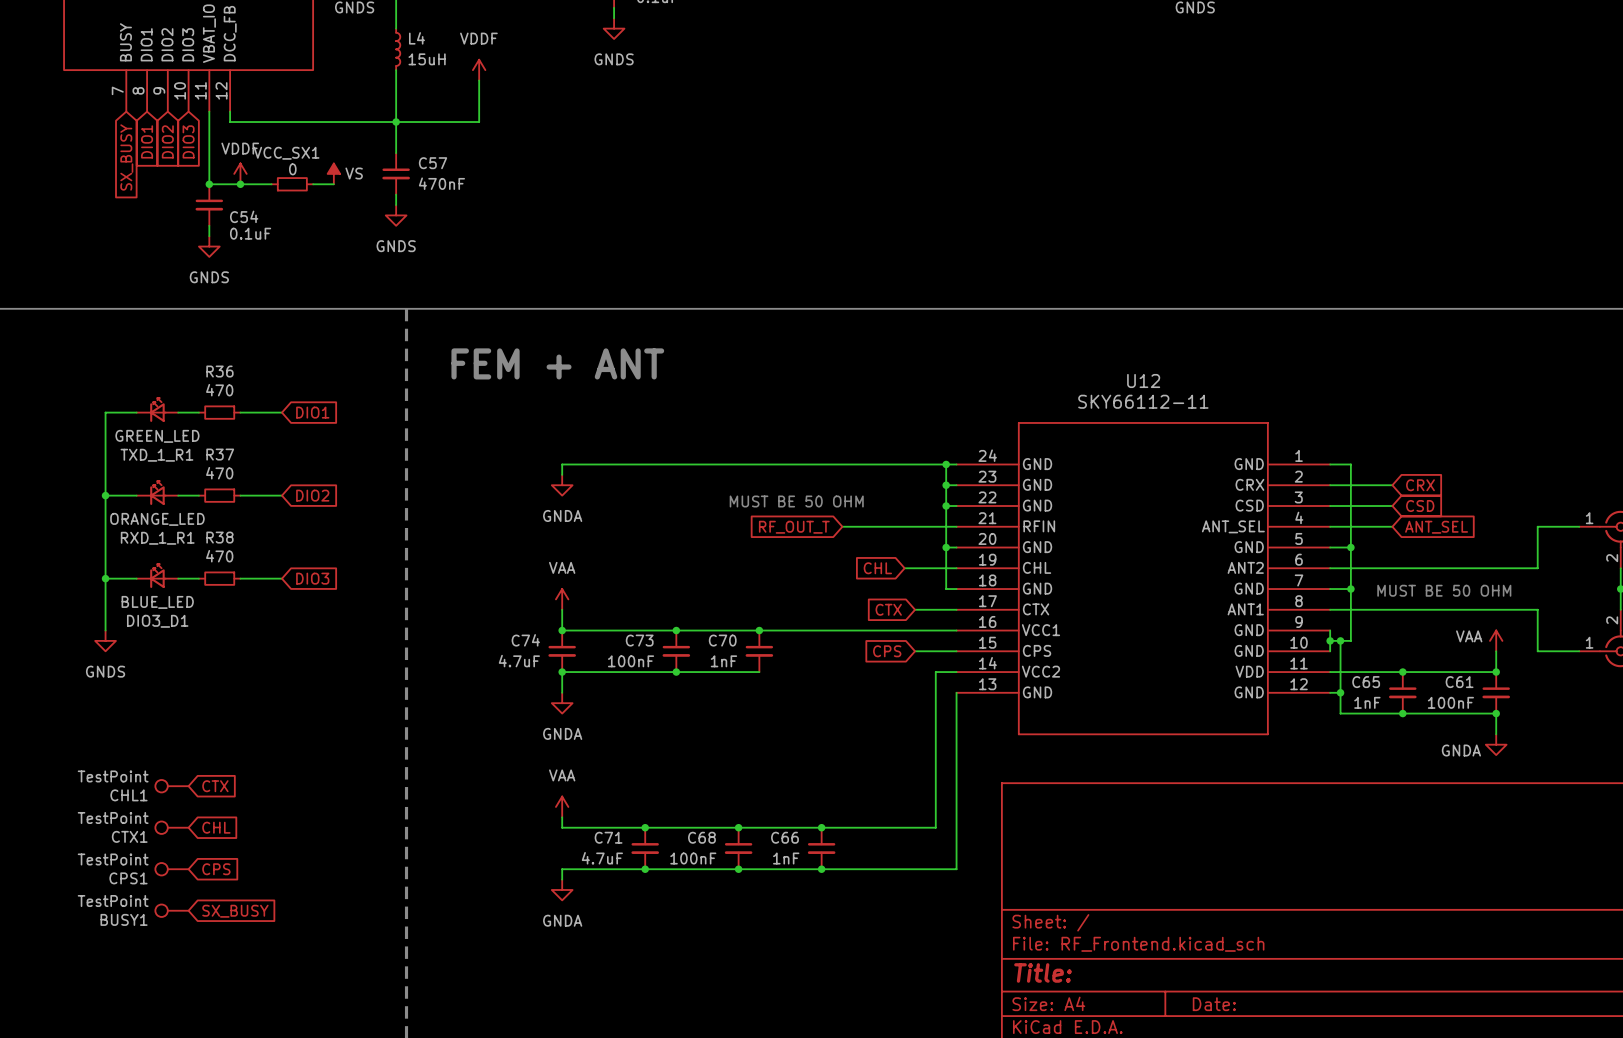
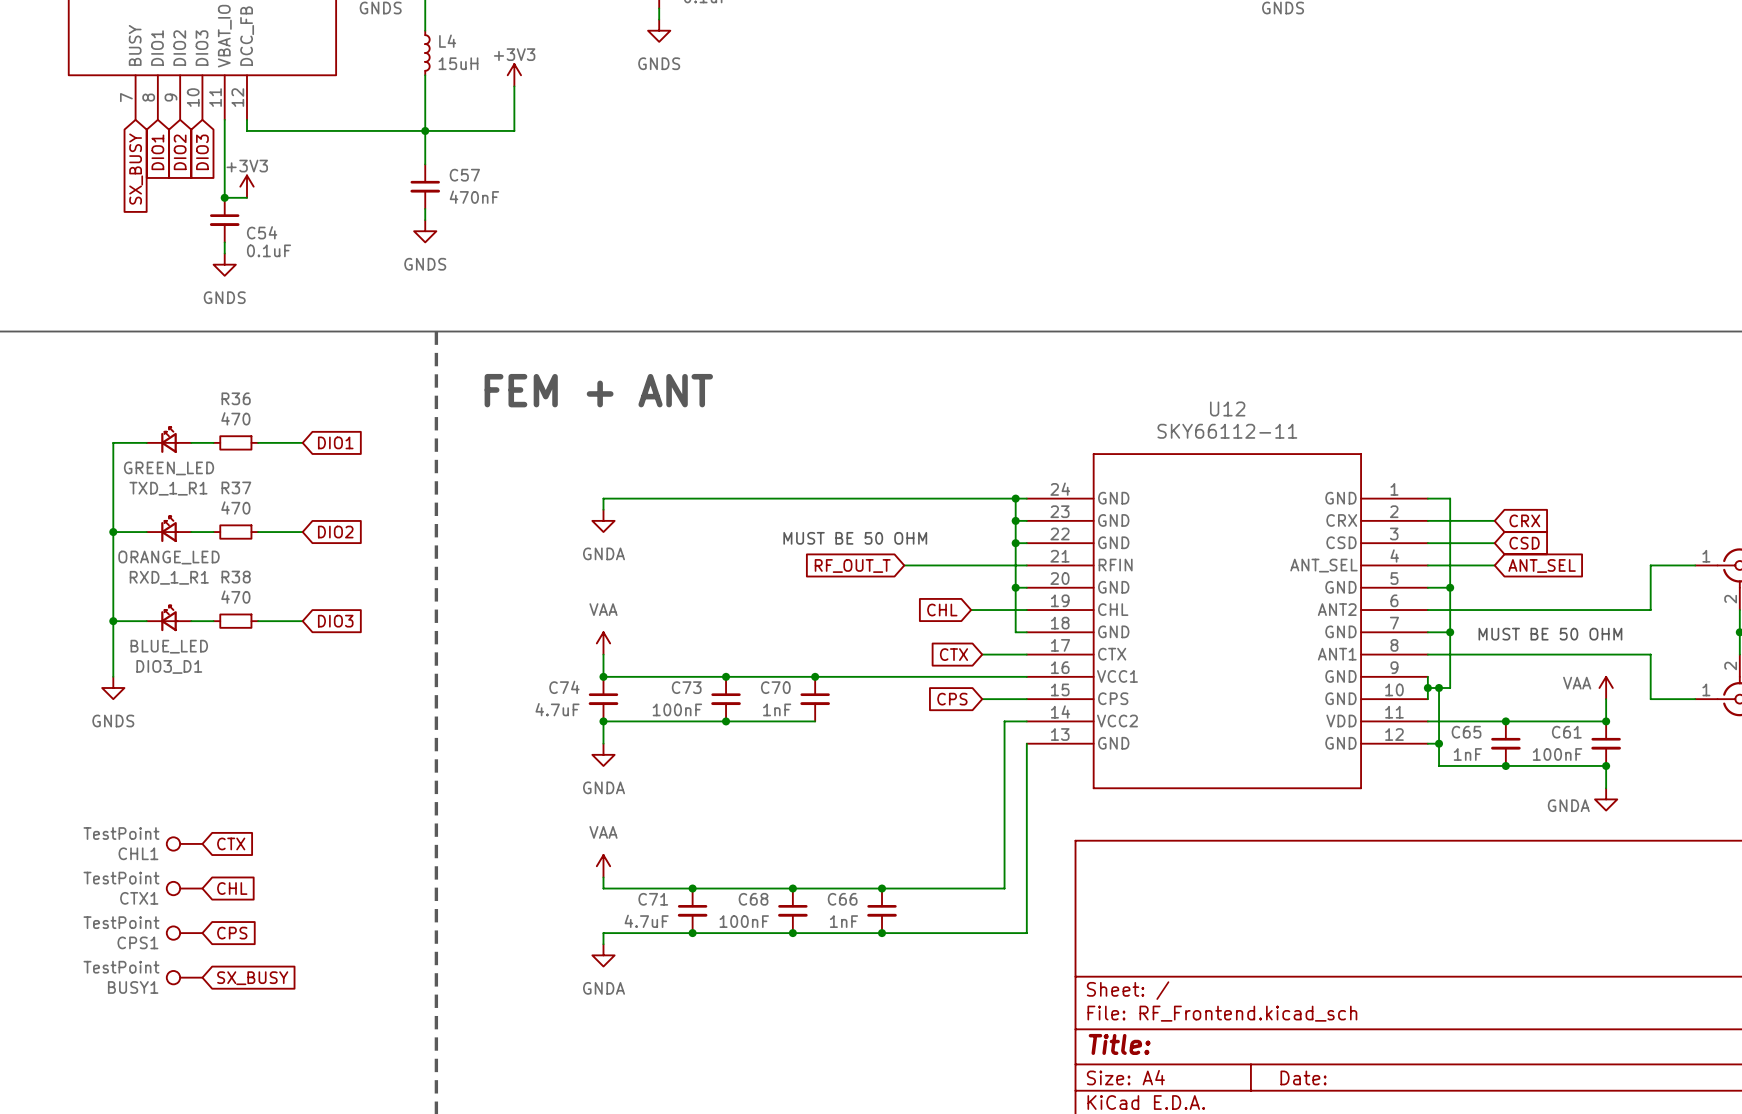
power symbol: VDDF (479, 70) -> +3V3 (514, 75)
power symbol: none -> +3V3 (246, 186)
power symbol: VDDF (240, 173) -> none
power symbol: VS (333, 173) -> none
wire: (230, 184) (271, 184) -> none
junction: (240, 184) -> none
VCC_SX1: 0 (292, 184) -> none
wire: (313, 184) (333, 184) -> none

